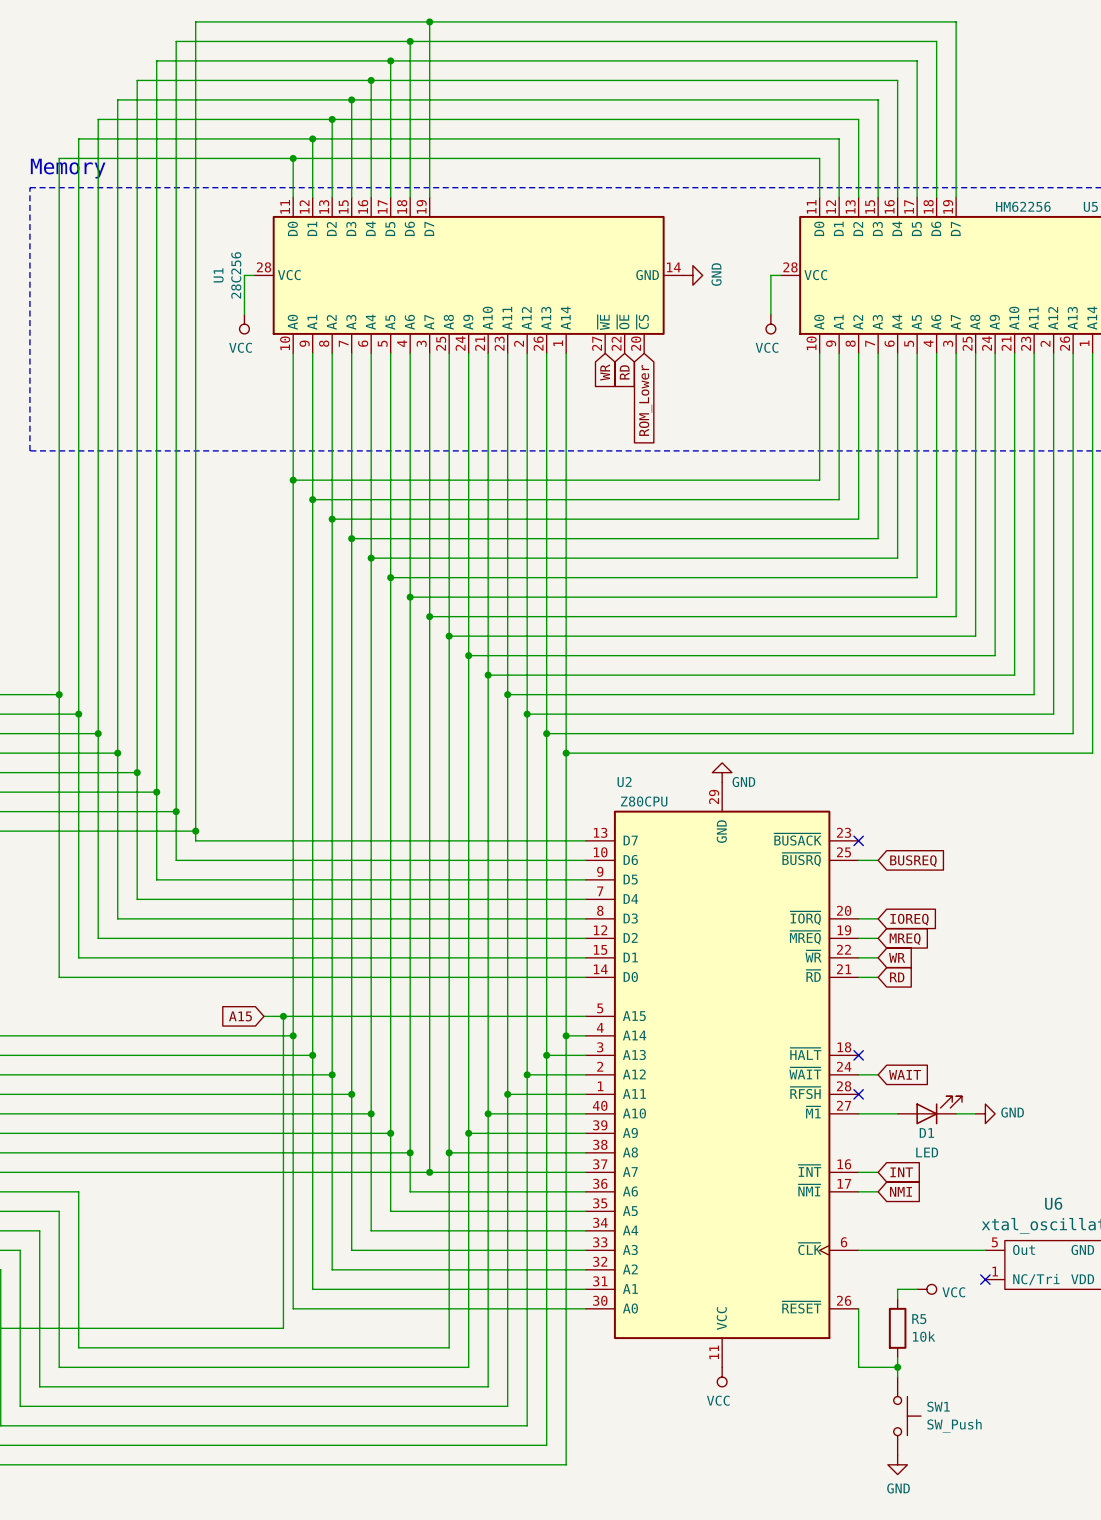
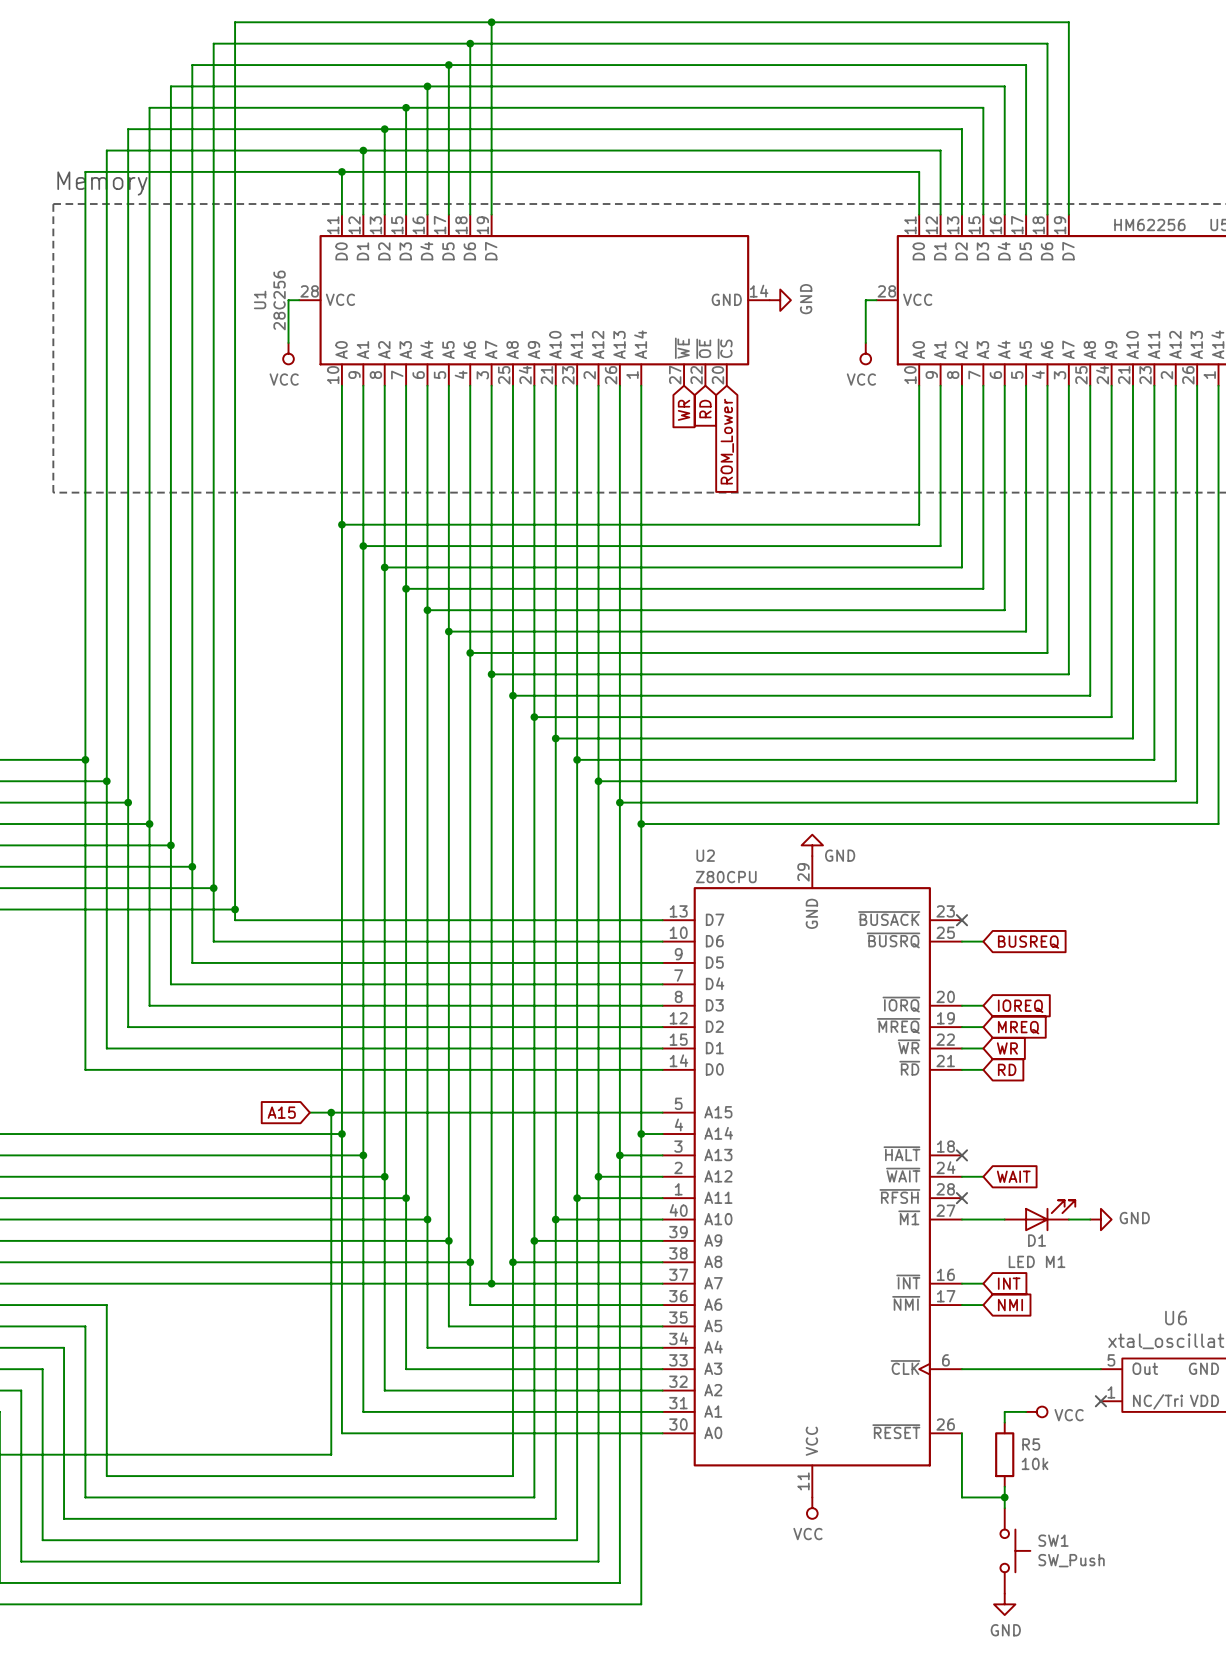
D1 value: LED (927, 1152) -> LED M1 (1037, 1261)

